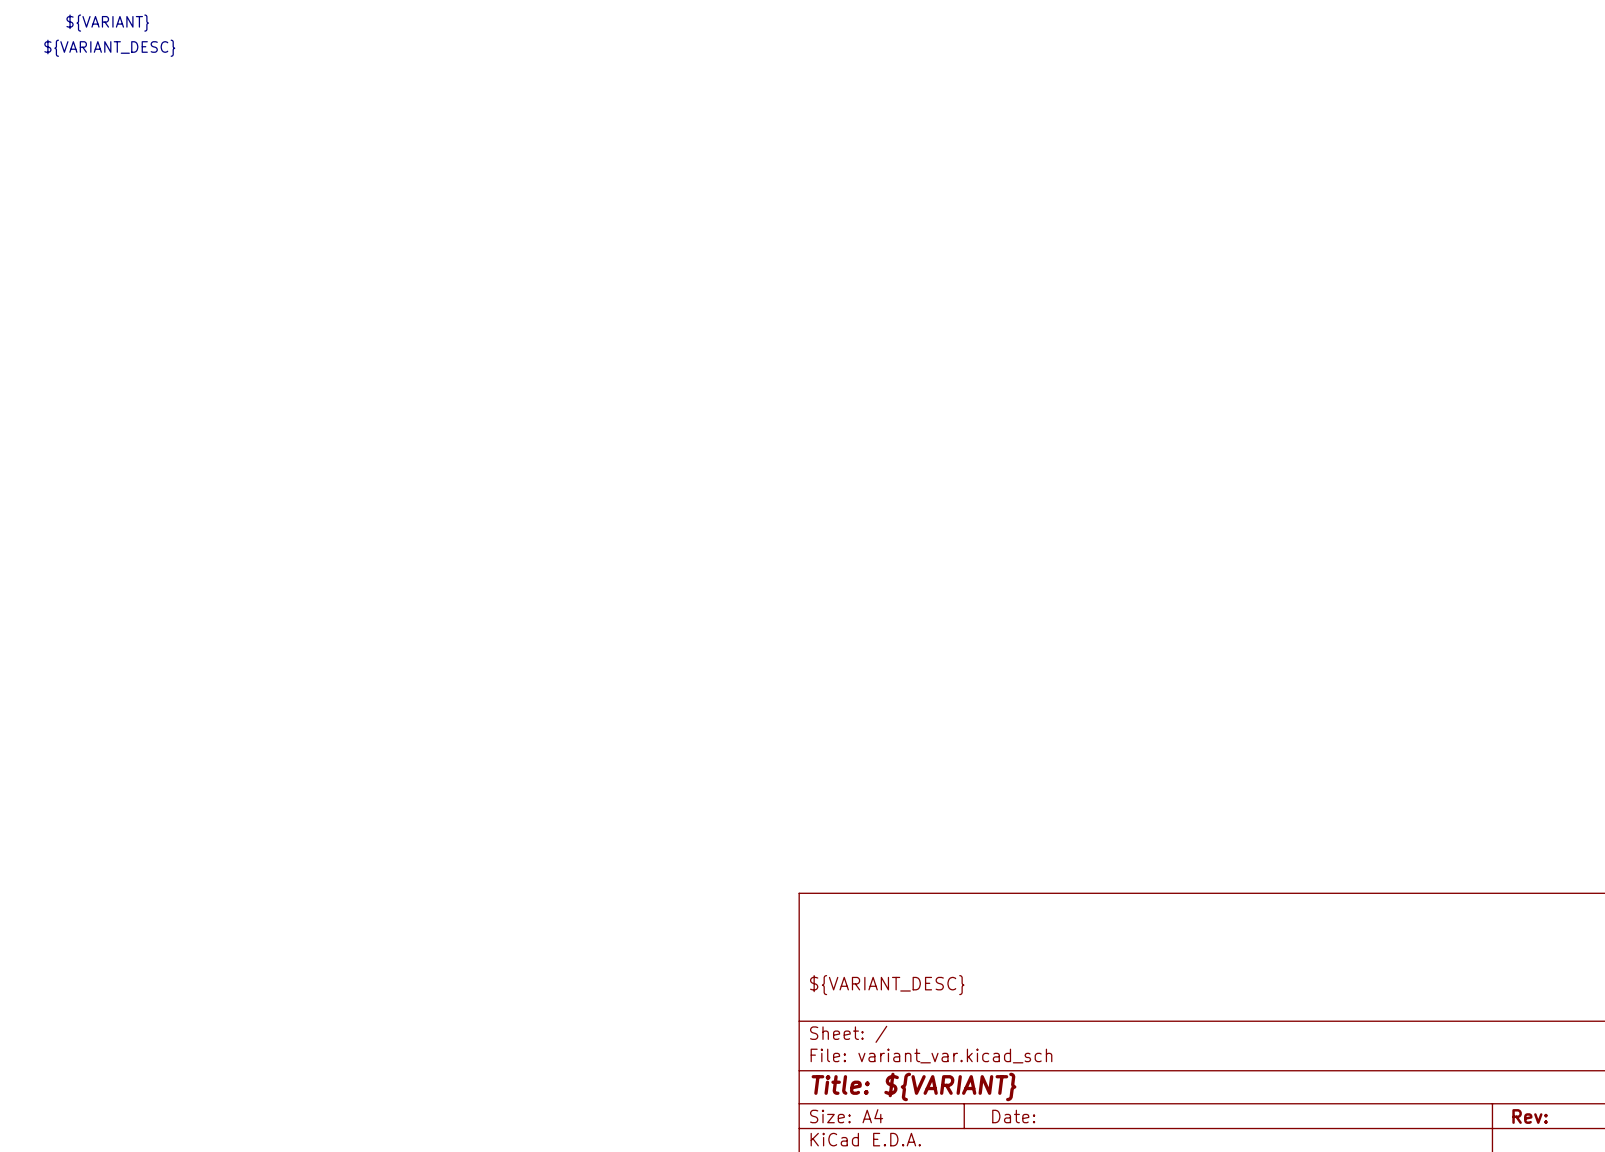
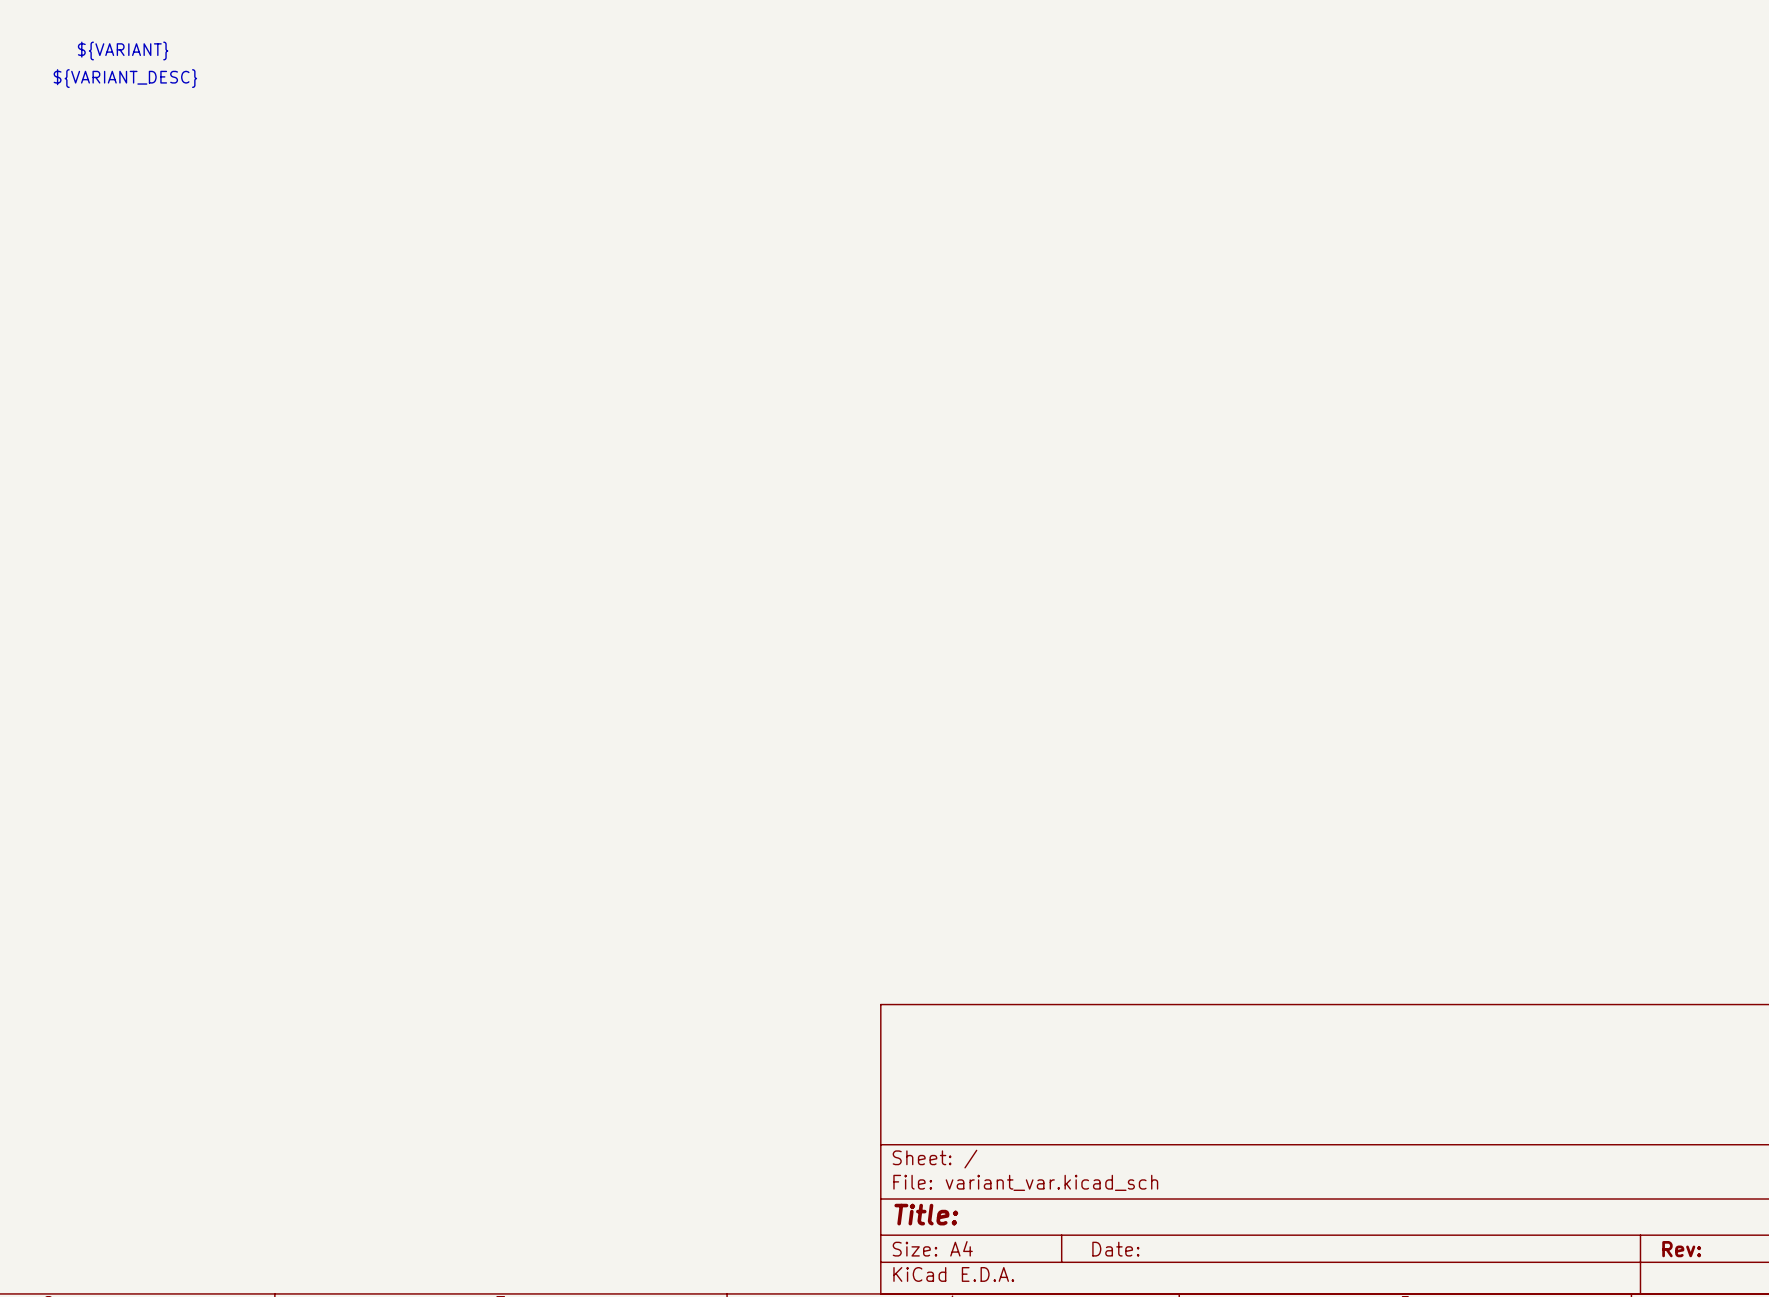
title block: ${VARIANT_DESC} (887, 985) -> none
title block: Title: ${VARIANT} (914, 1086) -> Title: (926, 1214)

